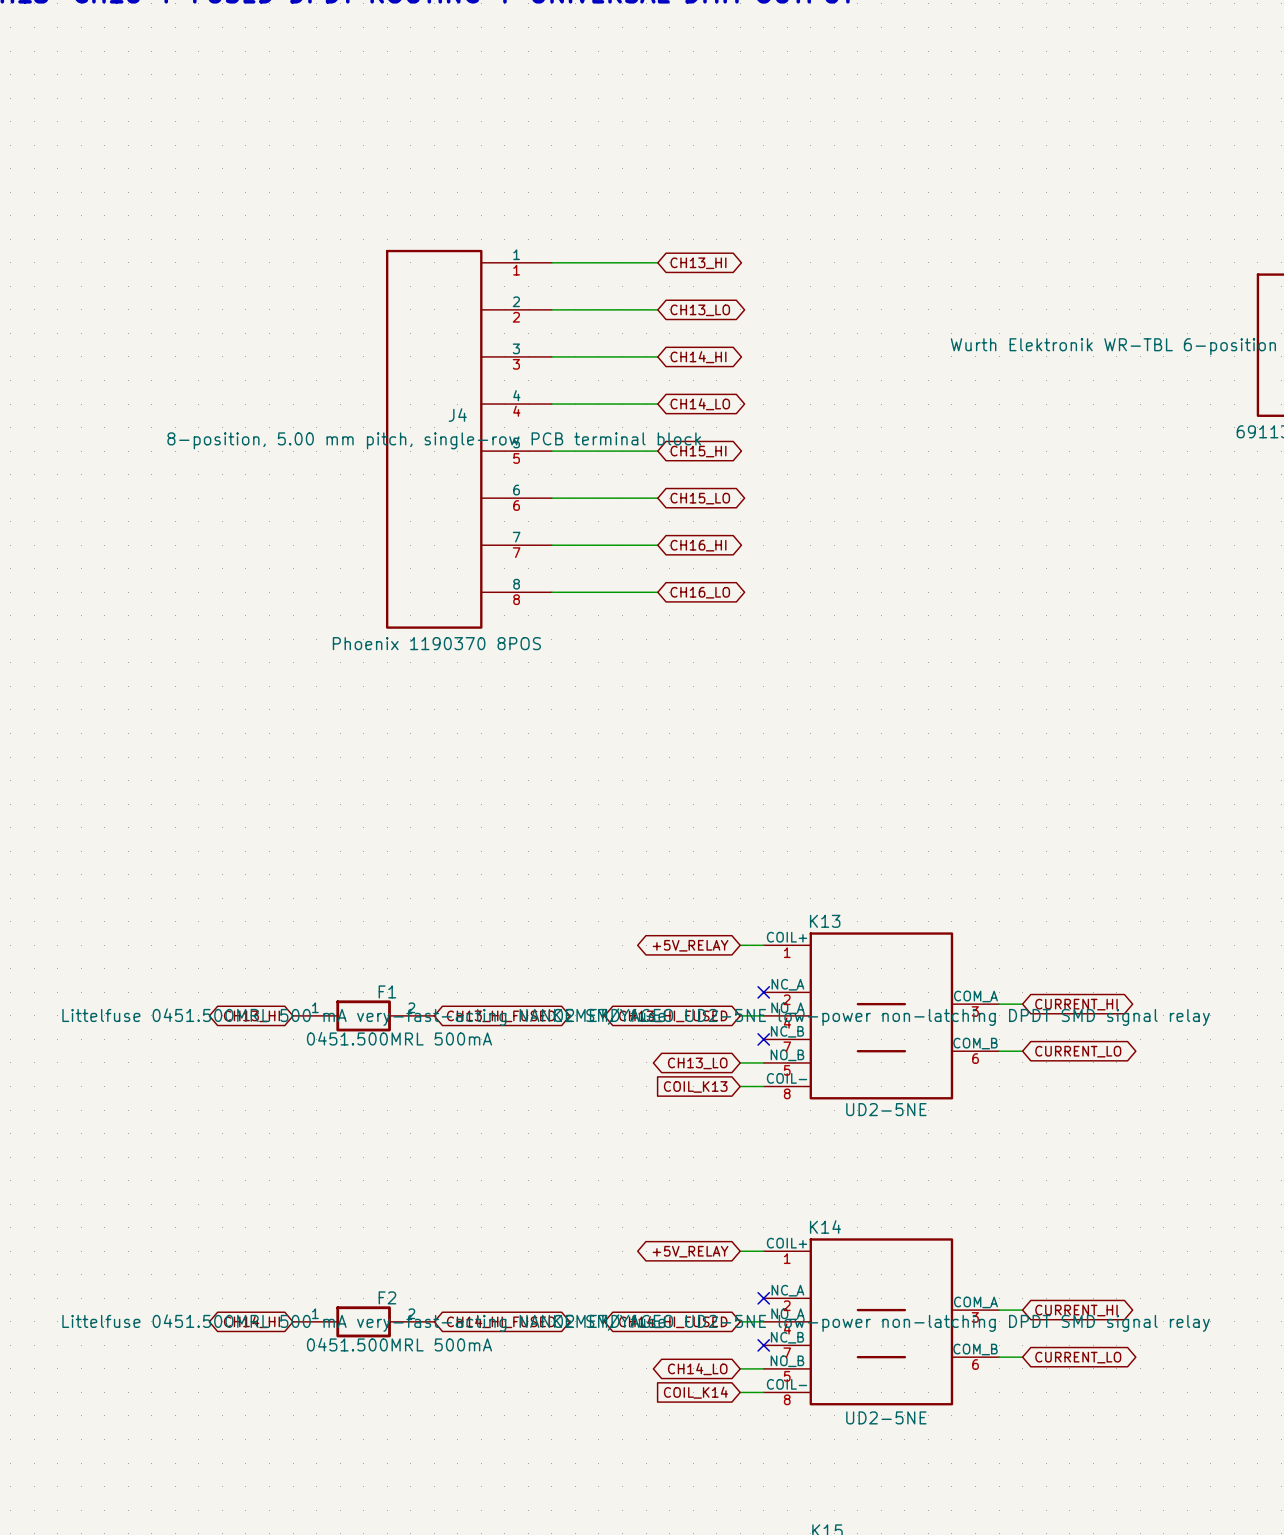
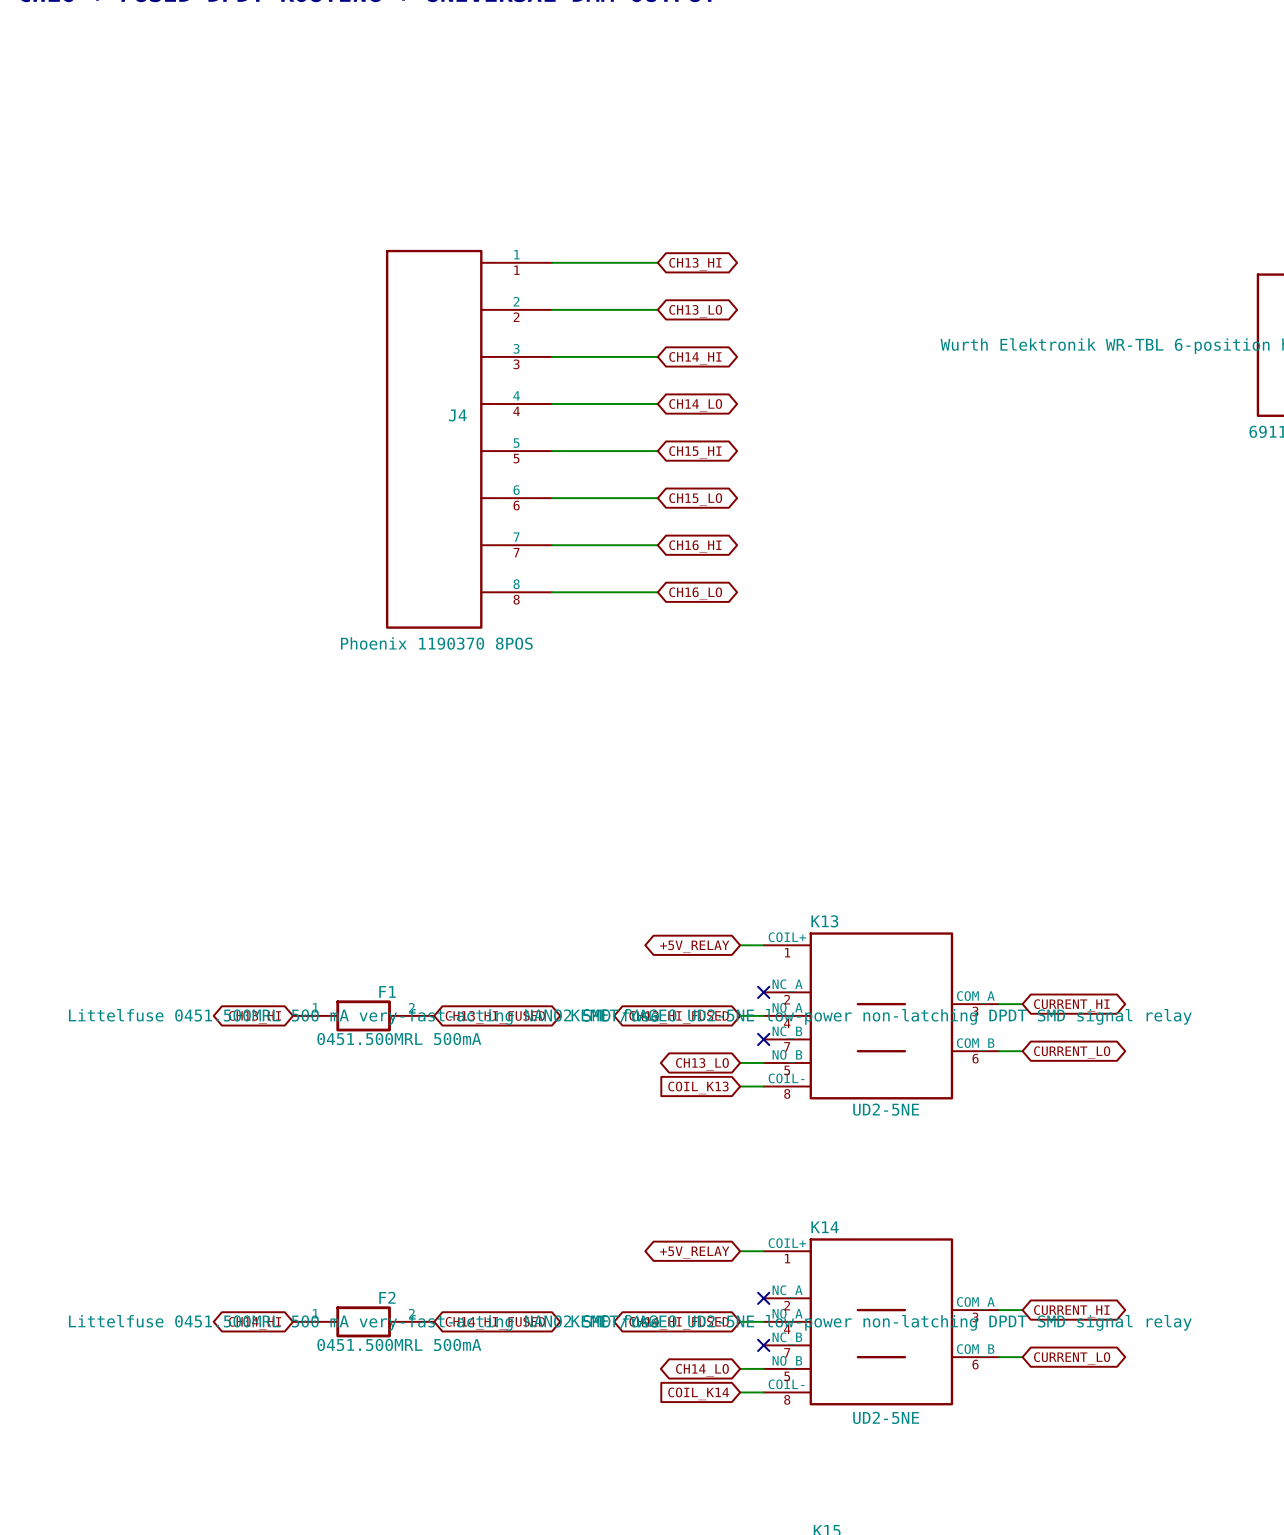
J4 text: 8-position, 5.00 mm pitch, single-row PCB terminal block (434, 440) -> none

